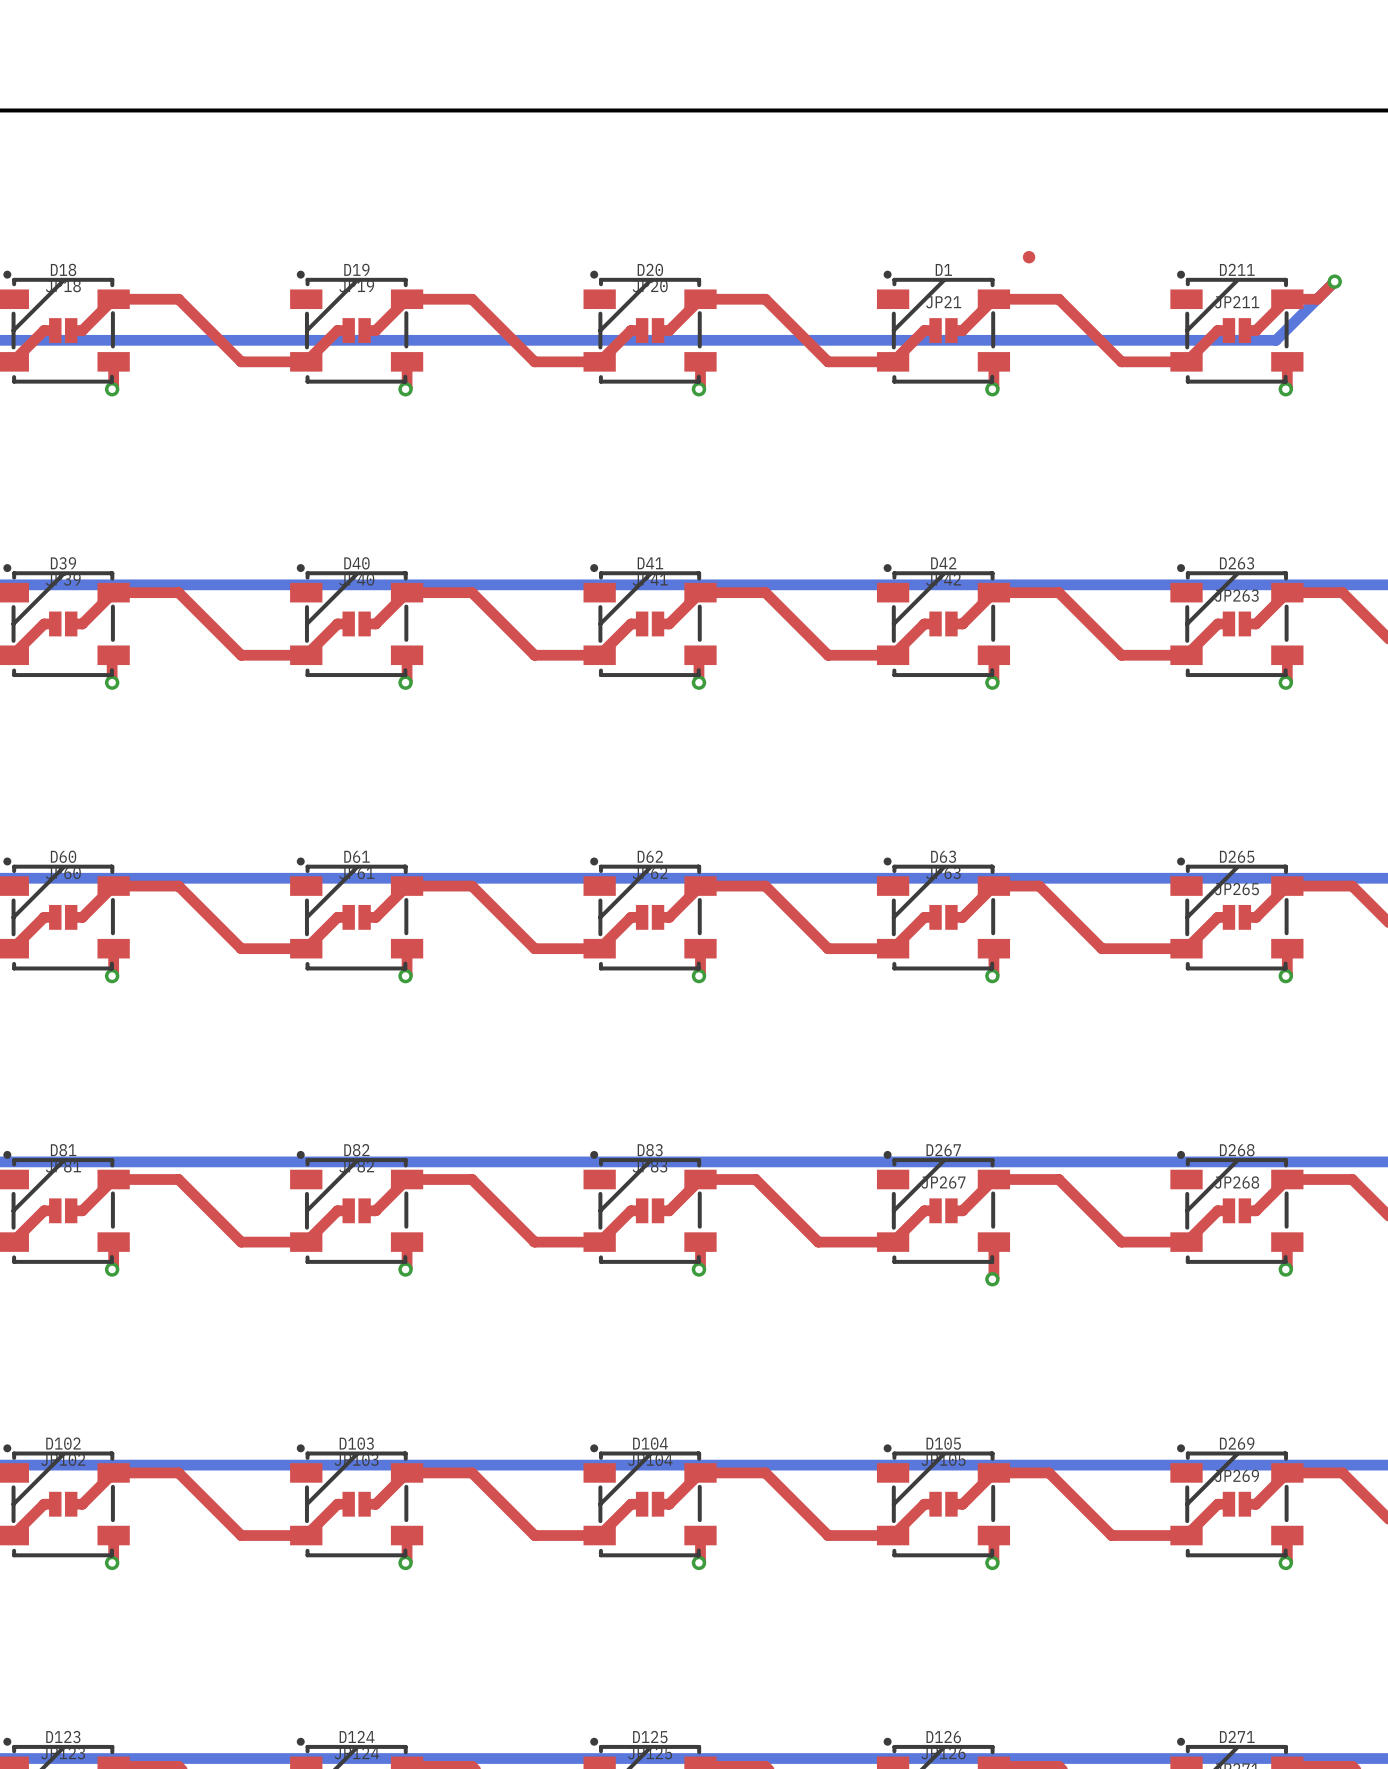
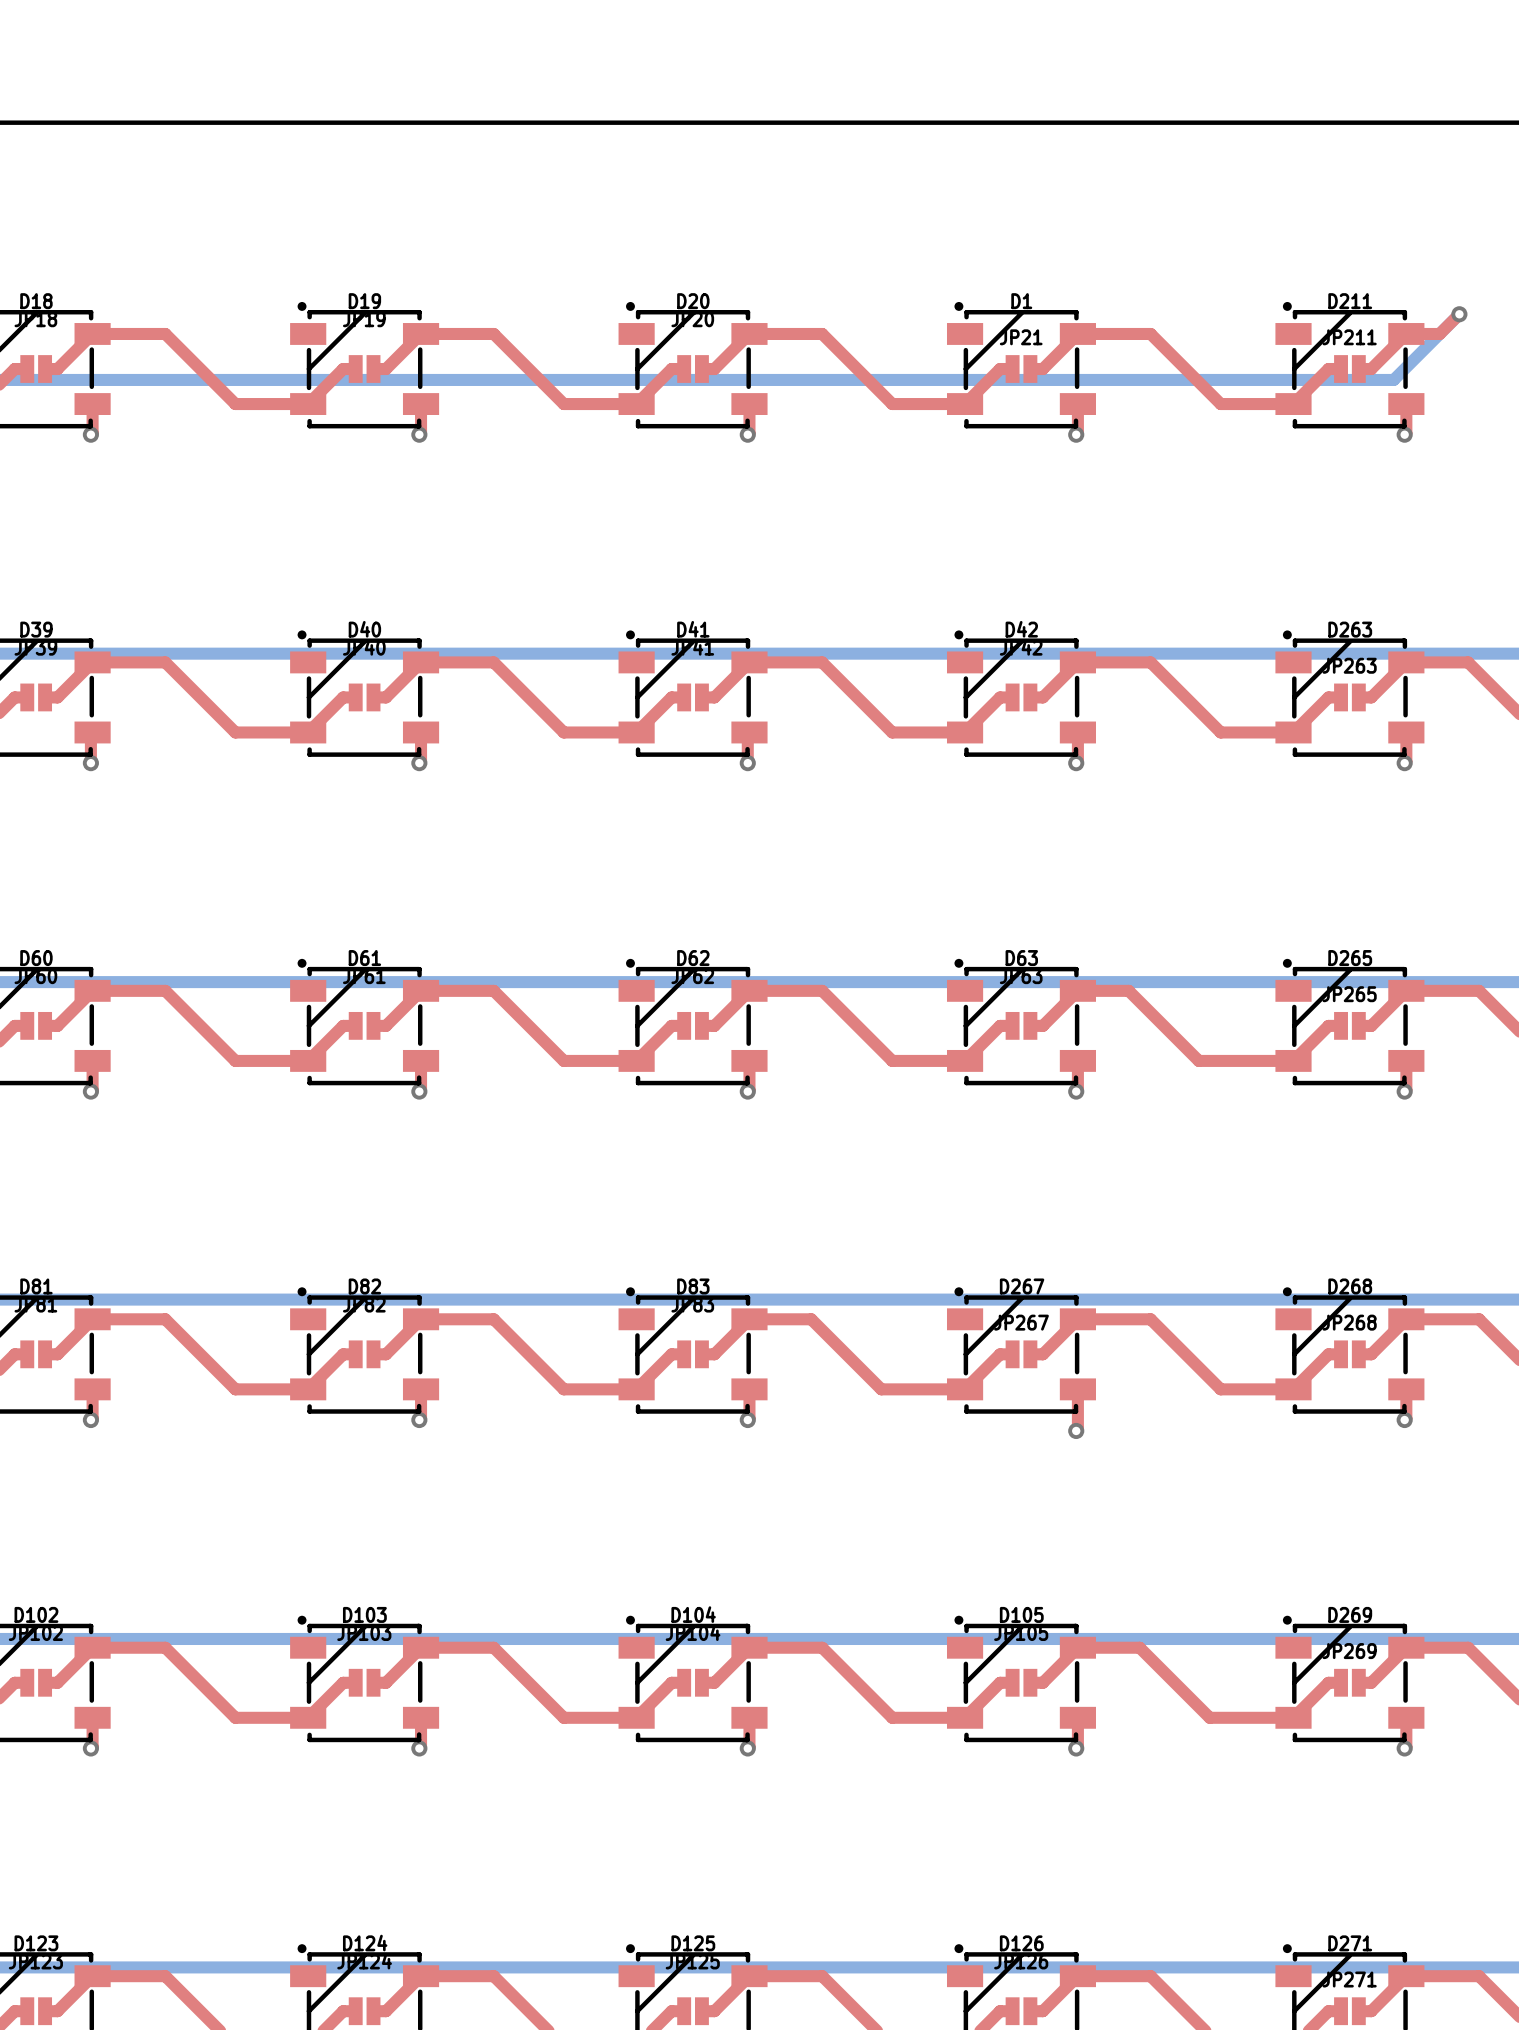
part: (1029, 257) -> none

